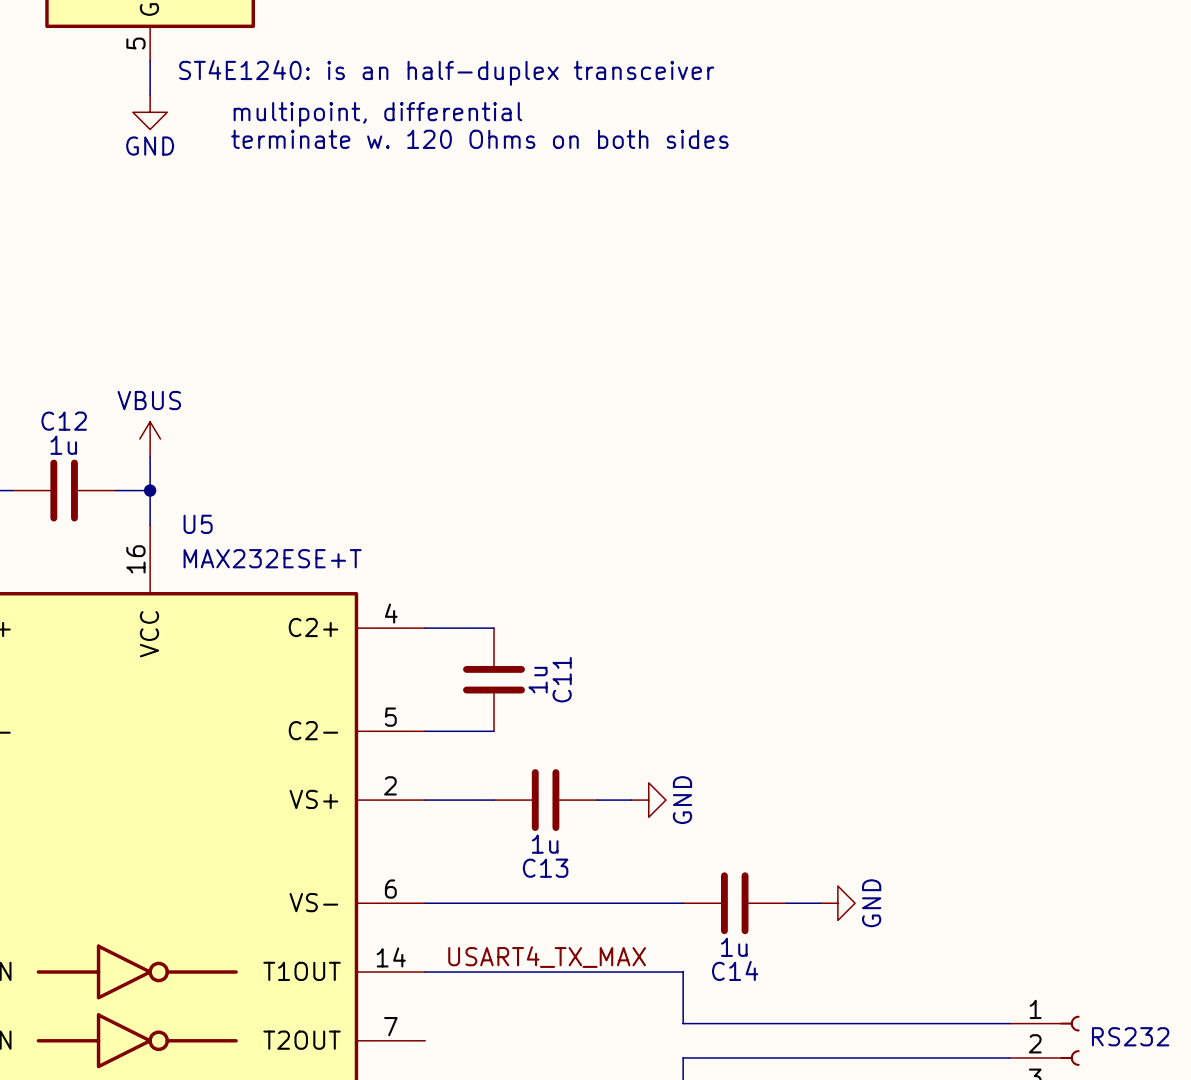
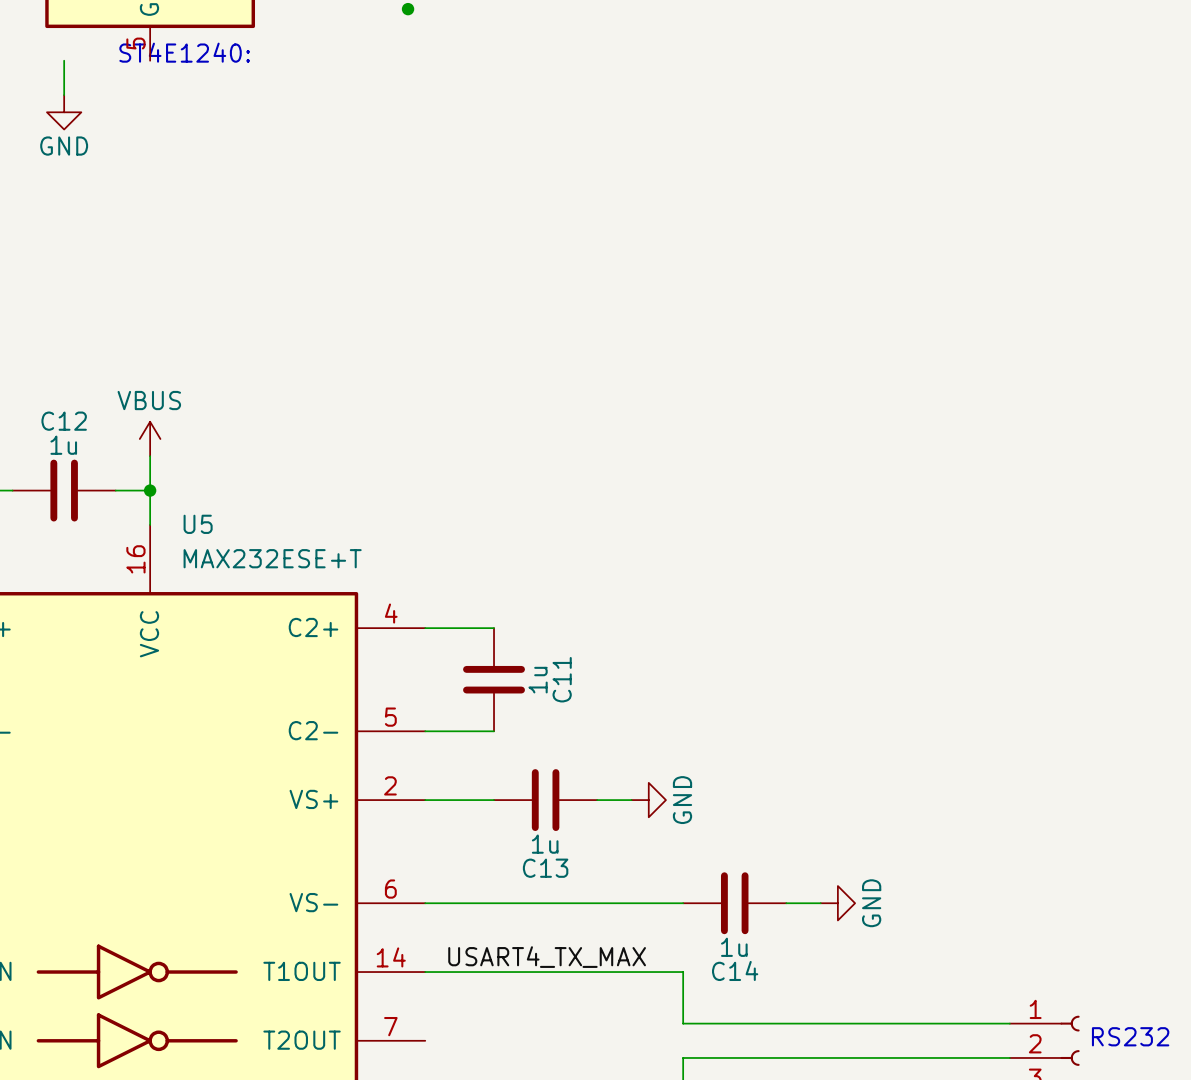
junction: none -> (408, 9)
text: none -> ST4E1240: (184, 52)
wire: (150, 60) (150, 95) -> (64, 60) (64, 95)
text: ST4E1240: is an half-duplex transceiver (446, 72) -> none
power symbol position: GND (150, 112) -> GND (64, 112)
text: multipoint, differential (377, 114) -> none
text: terminate w. 120 Ohms on both sides (479, 139) -> none

